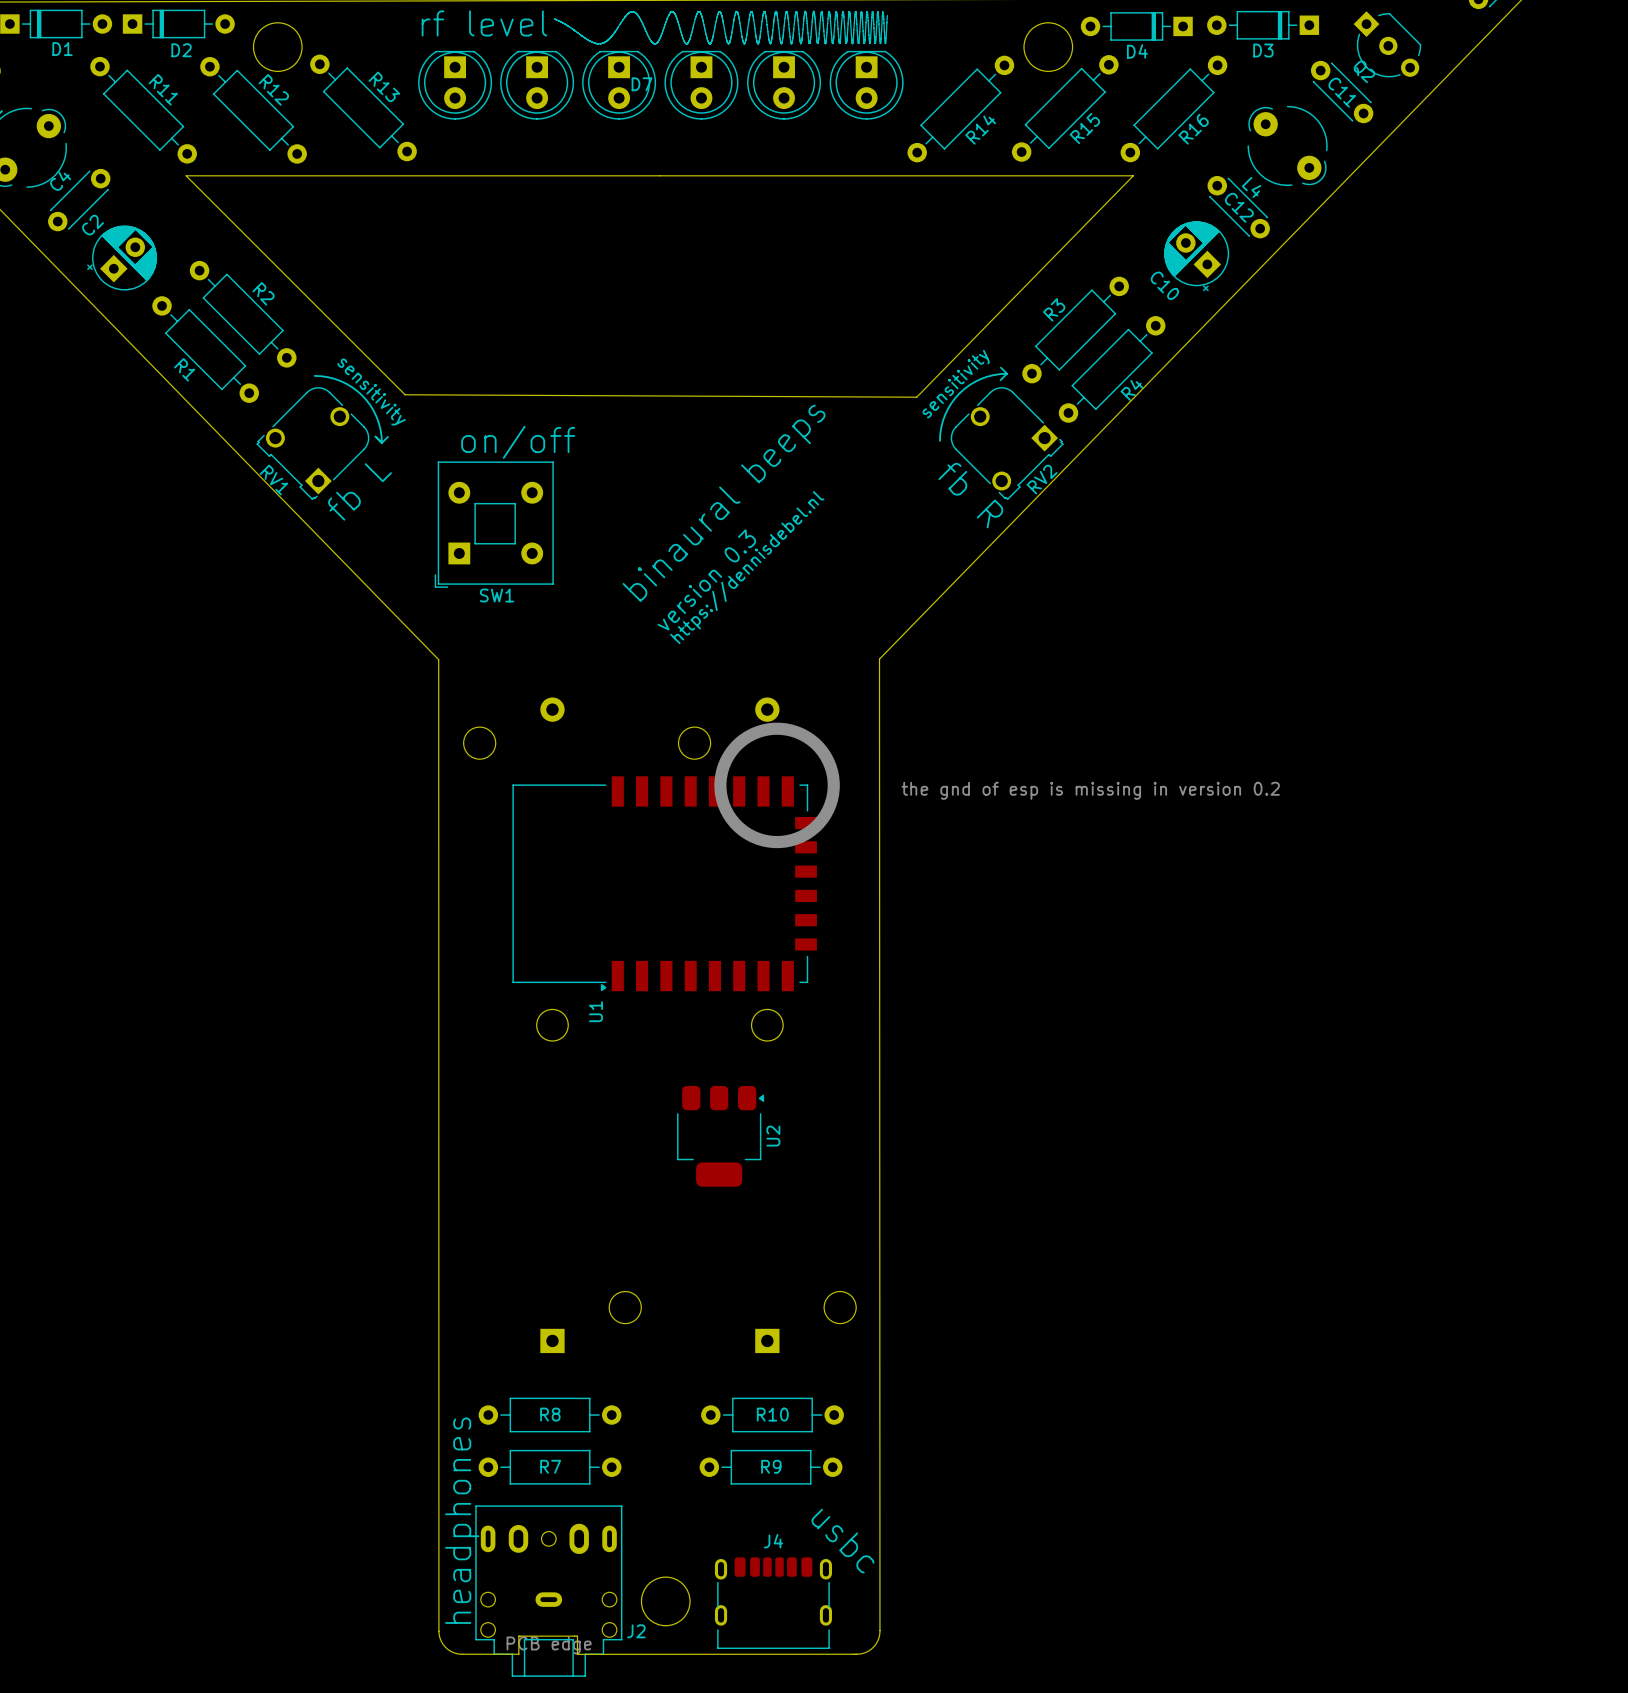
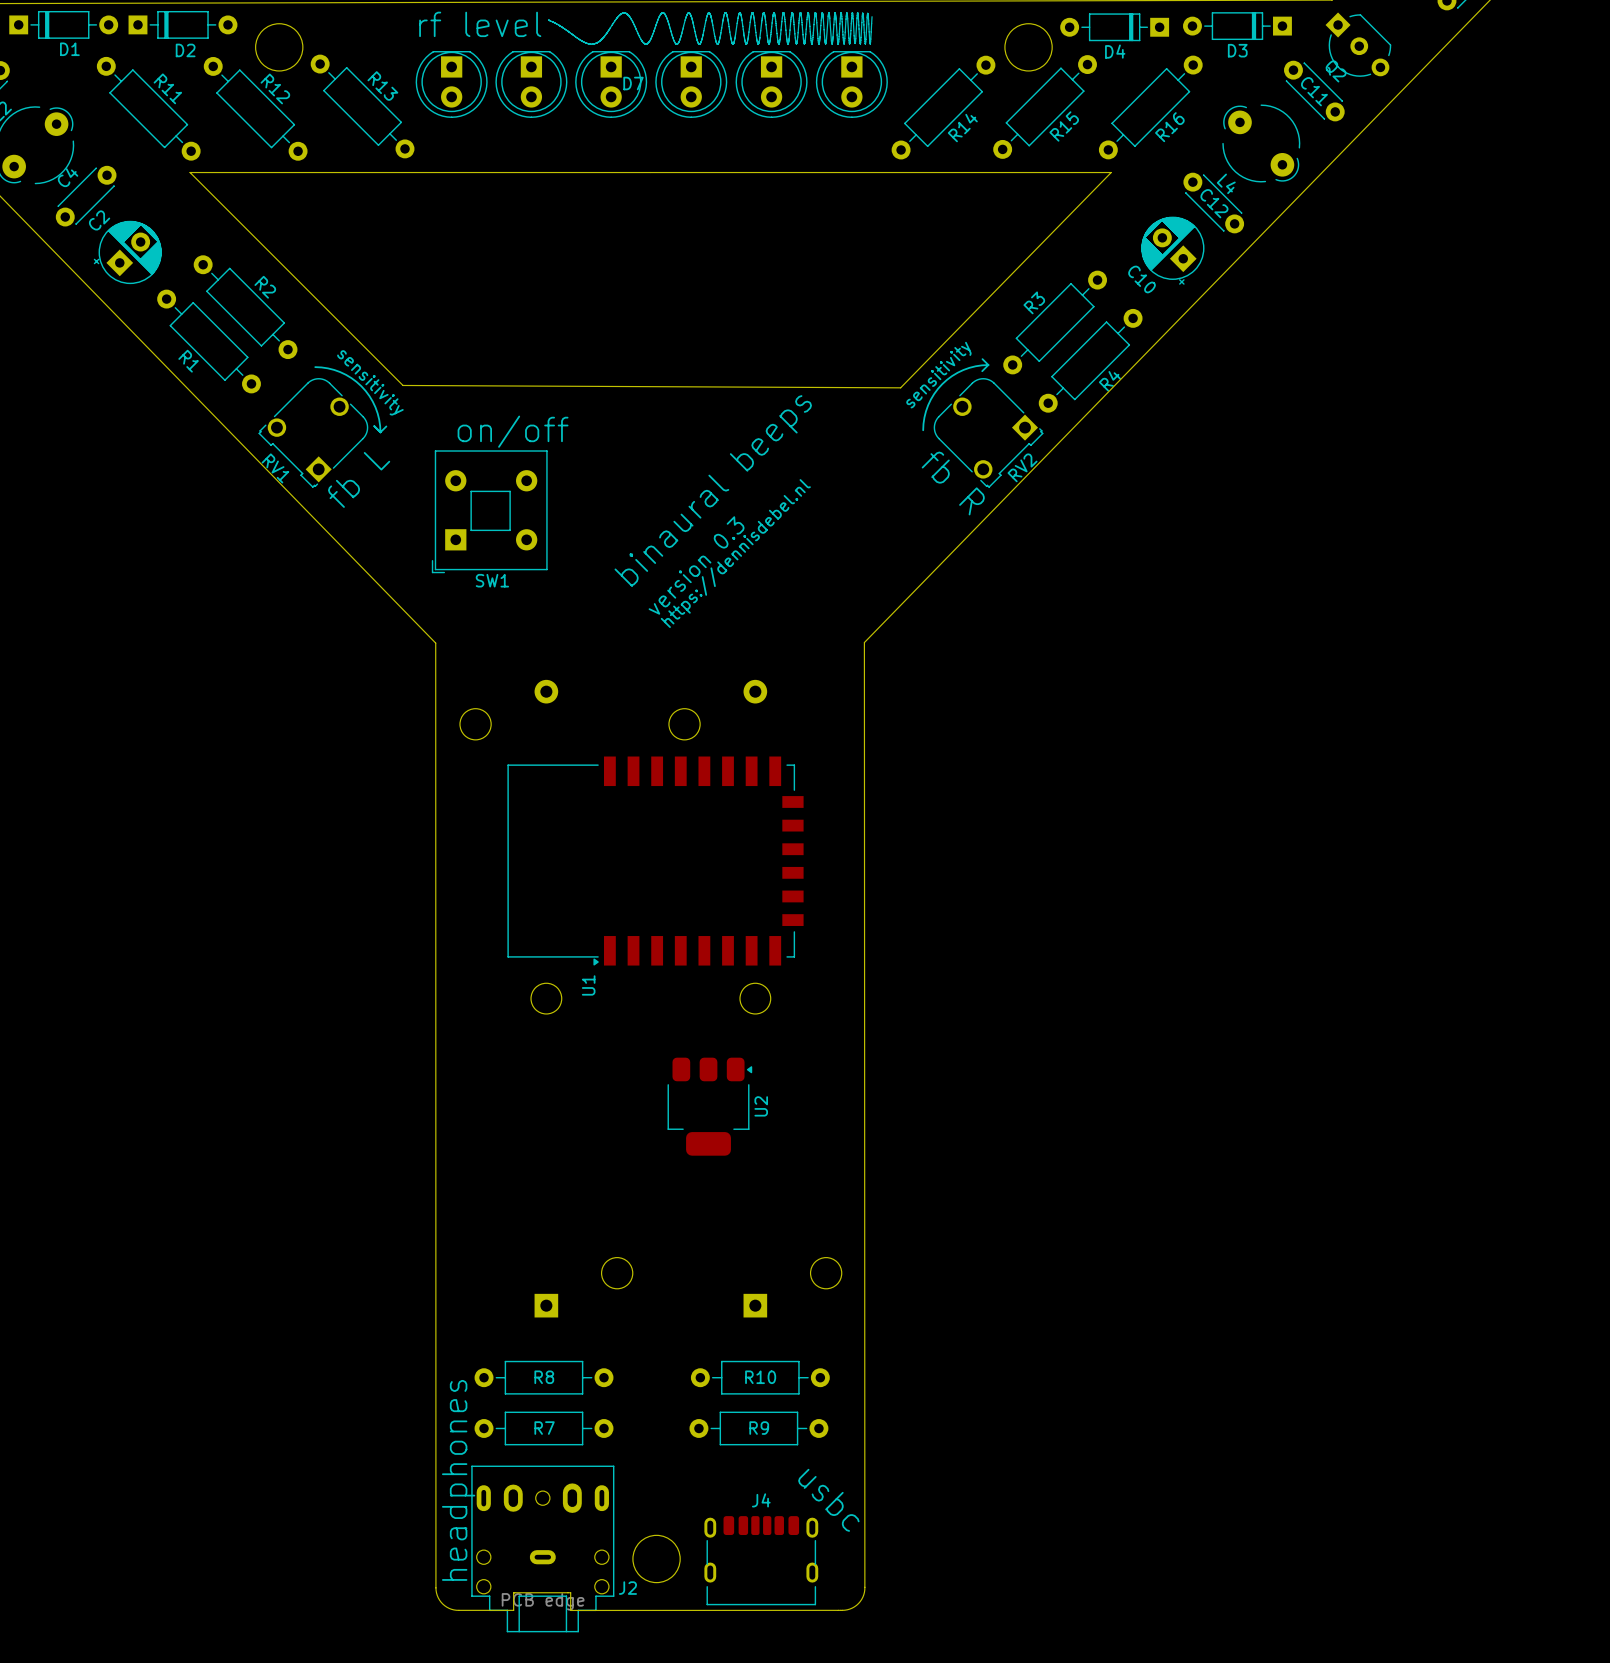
drawing: [714, 722, 840, 849] -> none
text: the gnd of esp is missing in version 0.2 (1090, 790) -> none

